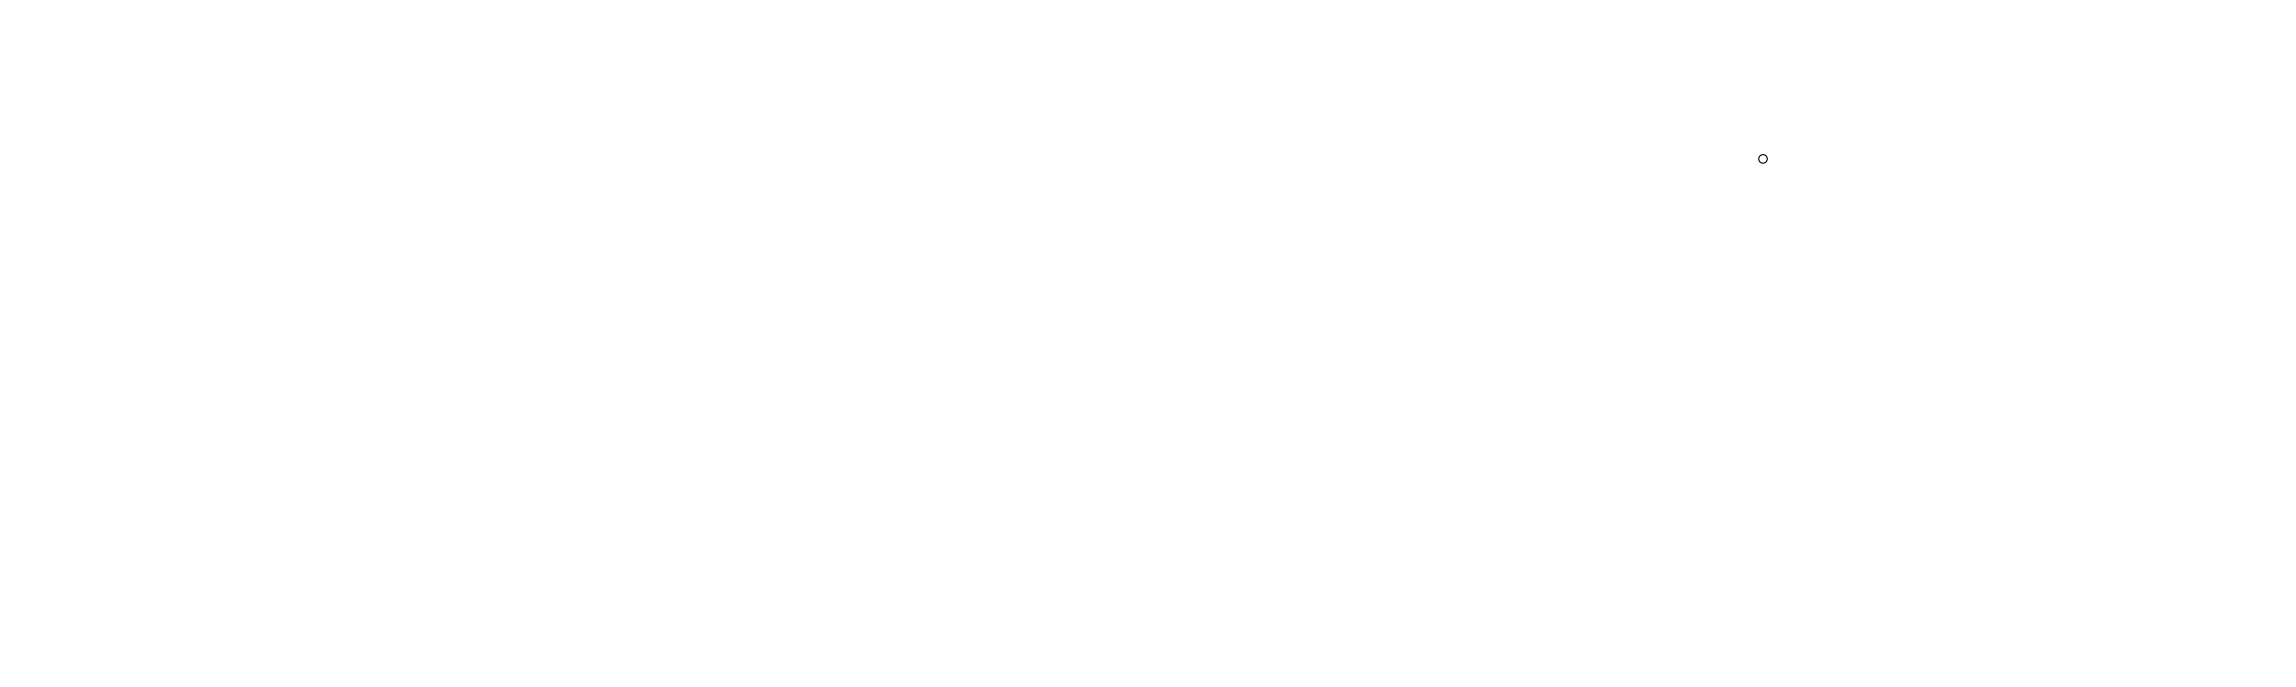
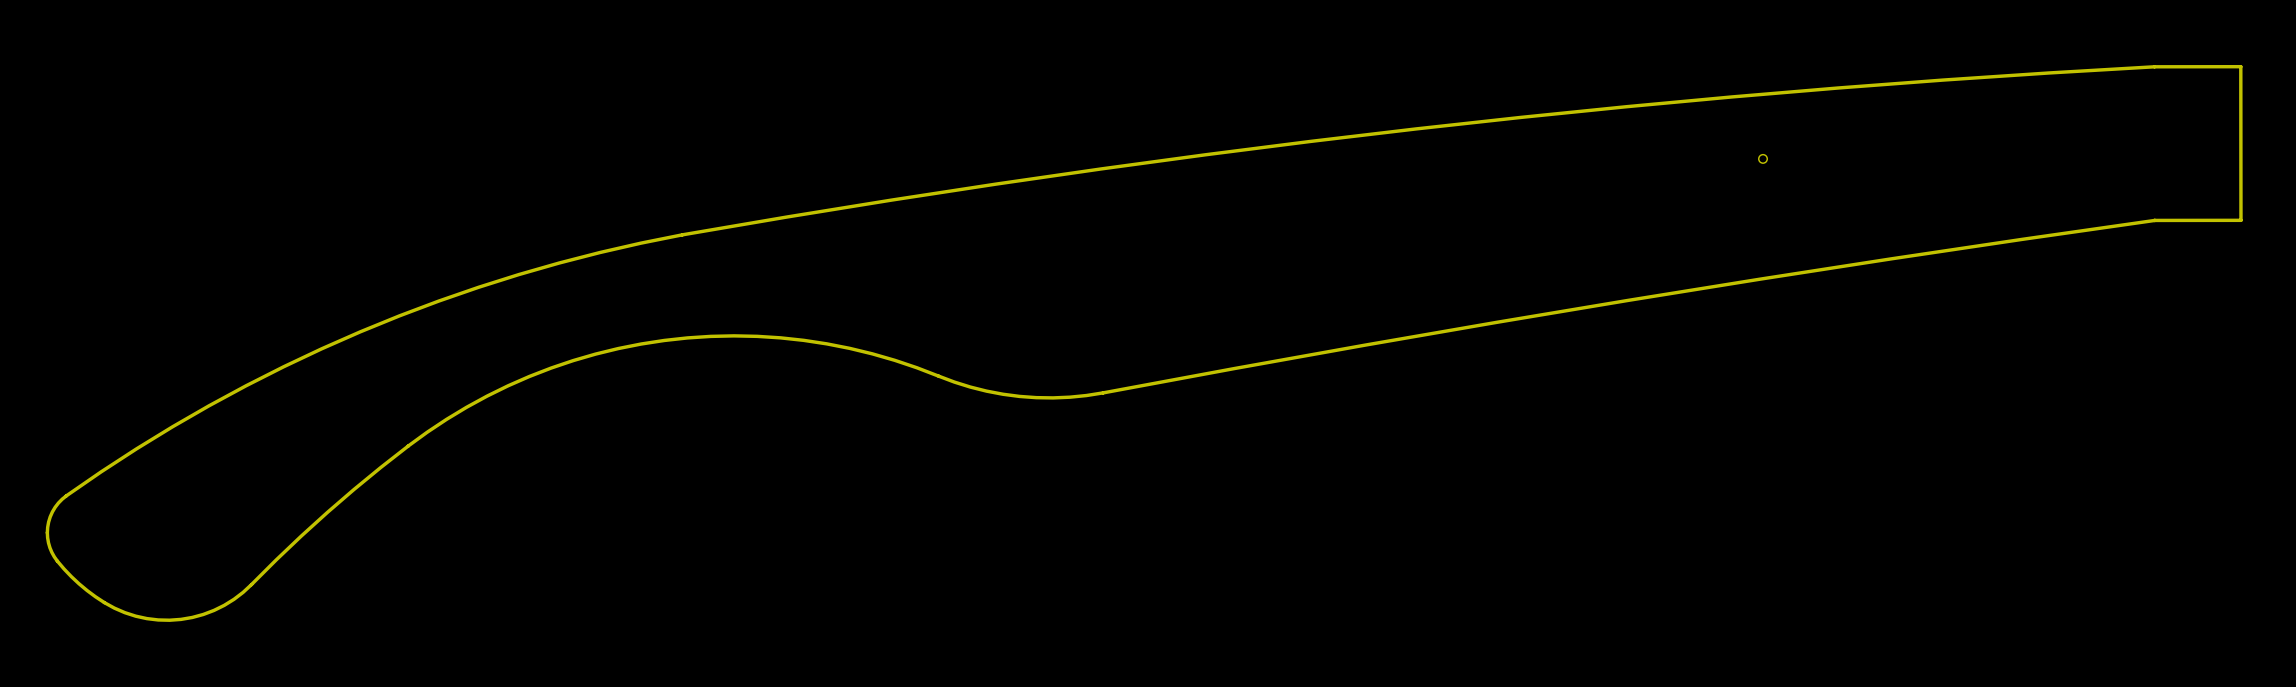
board edge: none -> (2154, 220) (2240, 220) (2240, 66) (2154, 66) (2048, 72) (1837, 88) (1626, 106) (1310, 141) (996, 184) (786, 217) (641, 243) (518, 274) (438, 301) (360, 331) (283, 366) (172, 426) (62, 499) (50, 516) (47, 537) (51, 552) (64, 569) (87, 590) (114, 608) (135, 616) (158, 619) (181, 619) (203, 614) (224, 605) (243, 592) (301, 535) (353, 489) (408, 445) (466, 407) (508, 385) (551, 368) (618, 348) (664, 340) (733, 335) (803, 340) (872, 353) (986, 391) (1019, 396) (1069, 397) (1627, 300) (1891, 258) (2154, 220)

